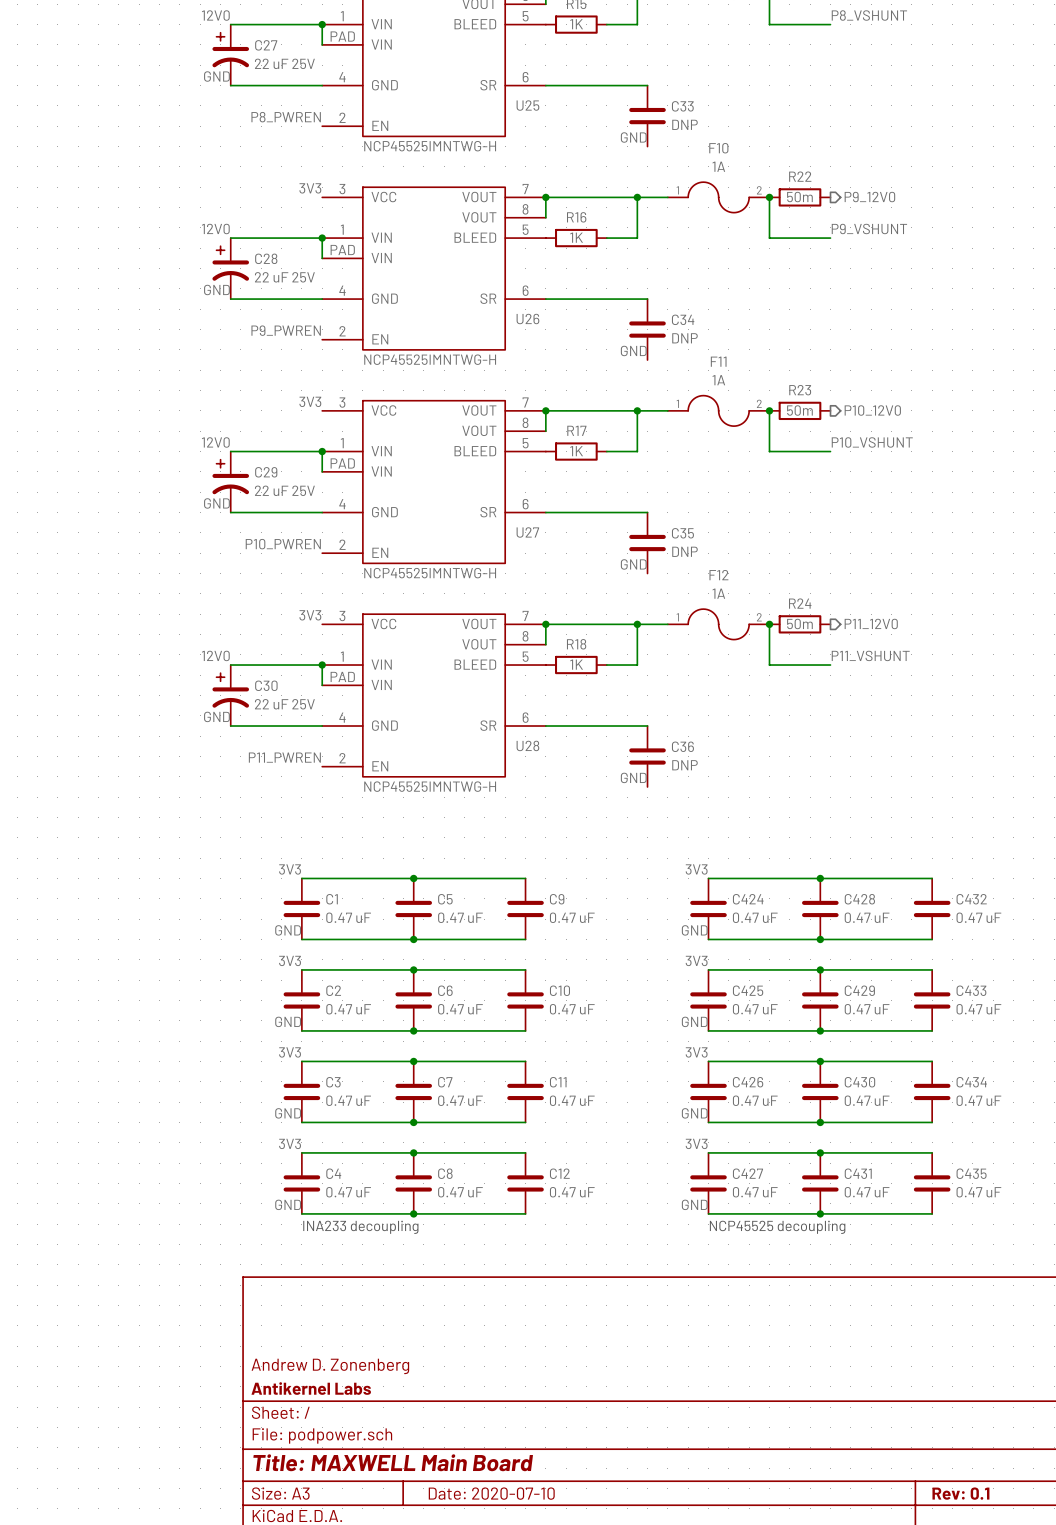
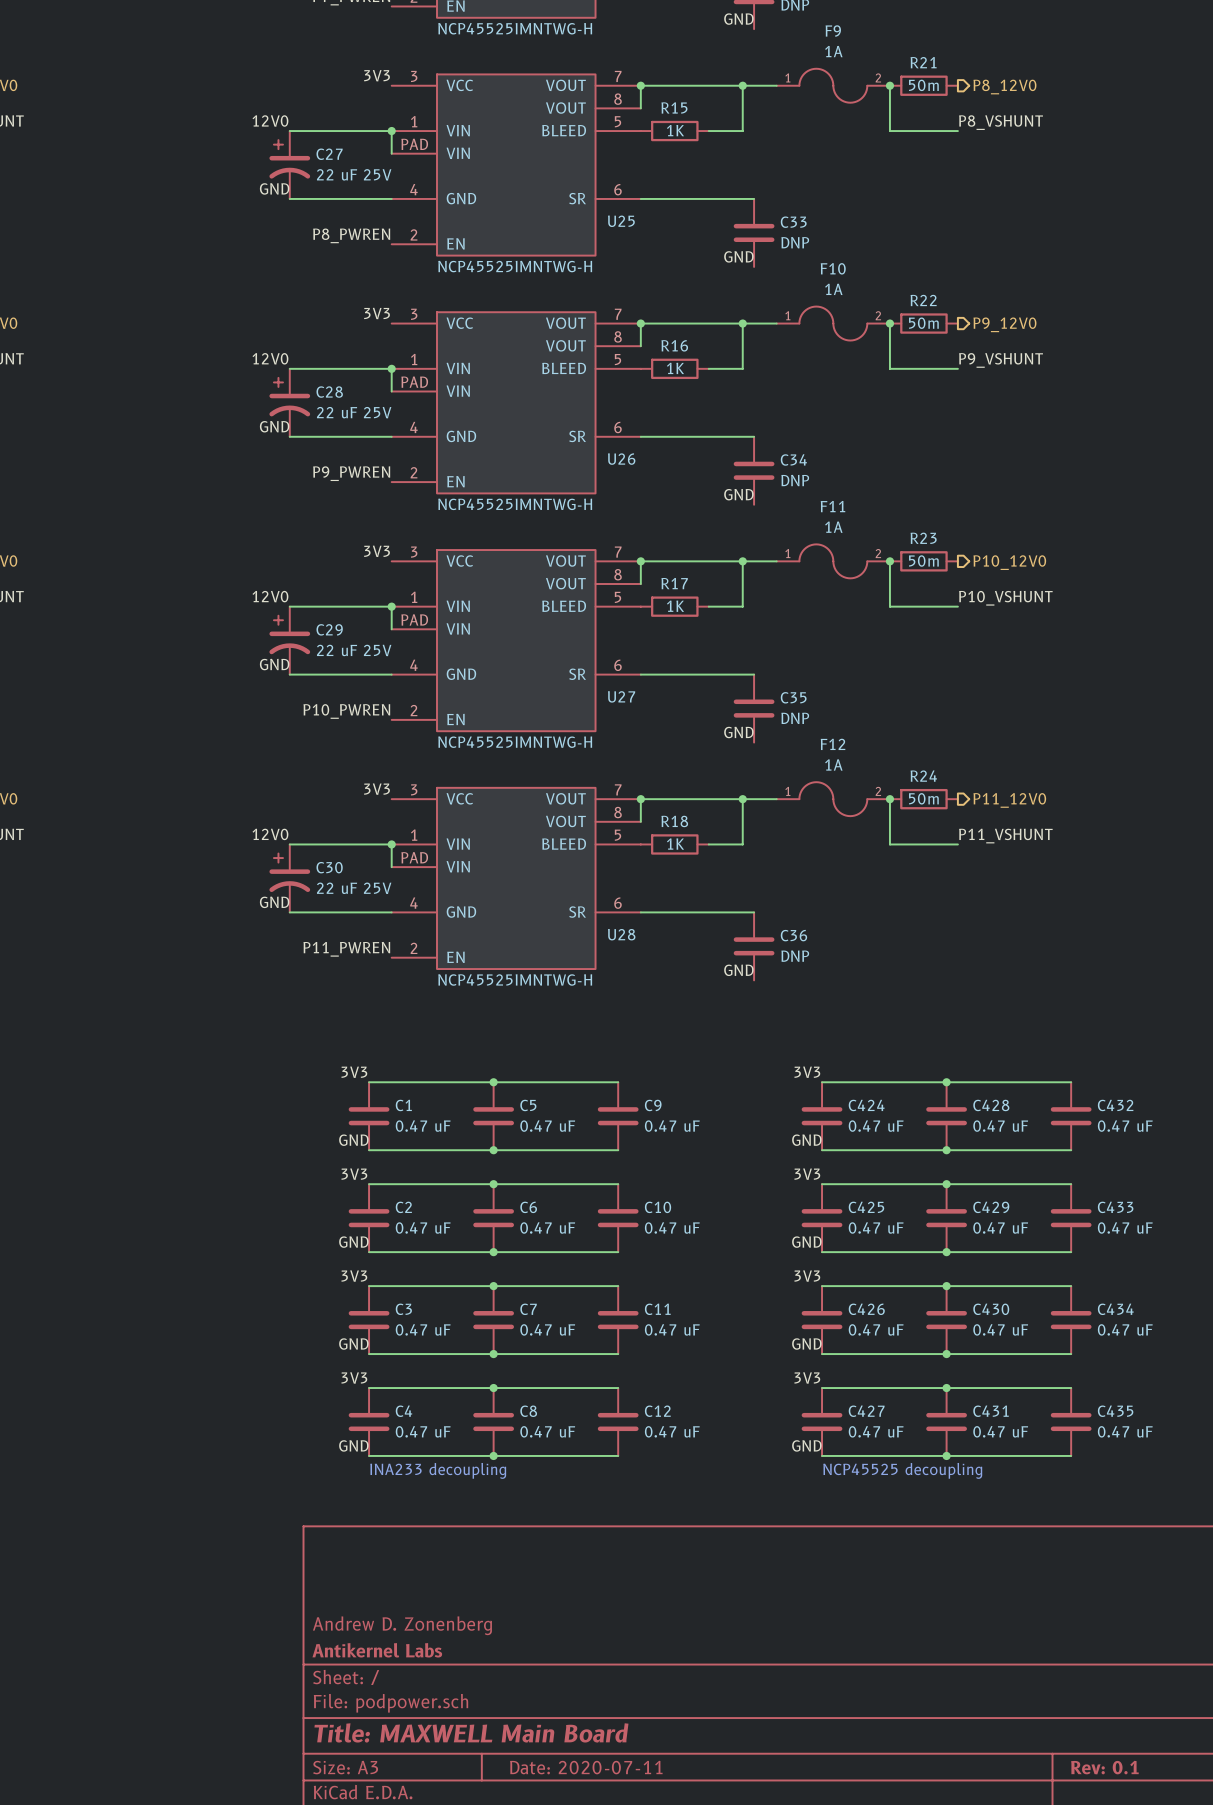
title block: Date: 2020-07-10 (491, 1493) -> Date: 2020-07-11 (586, 1767)

